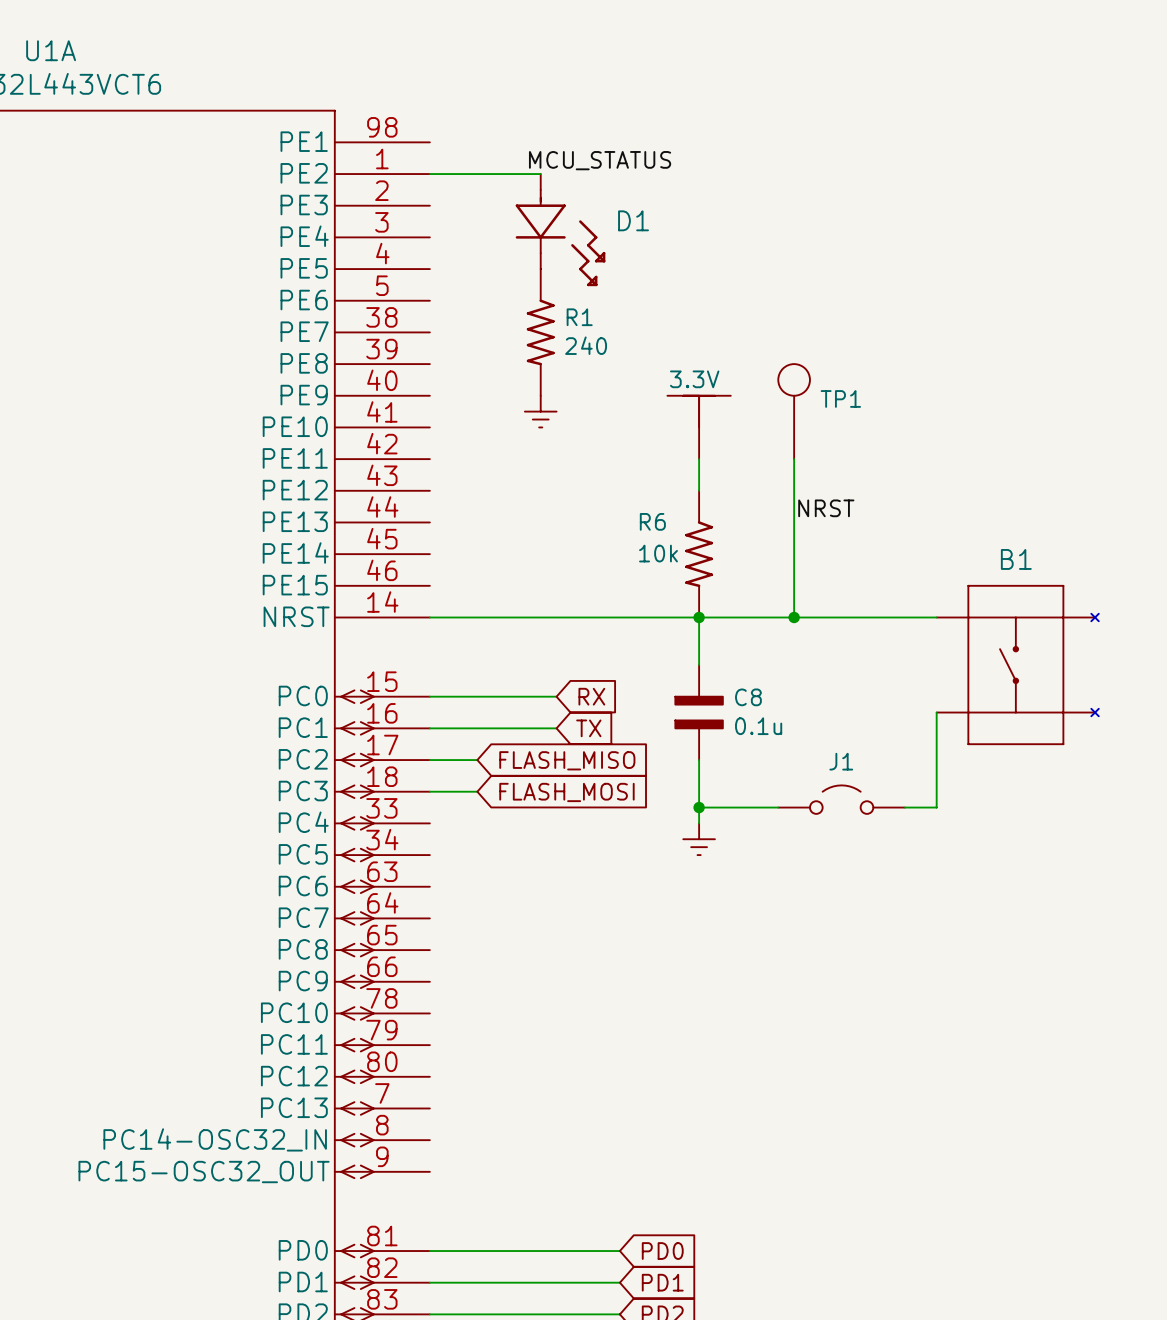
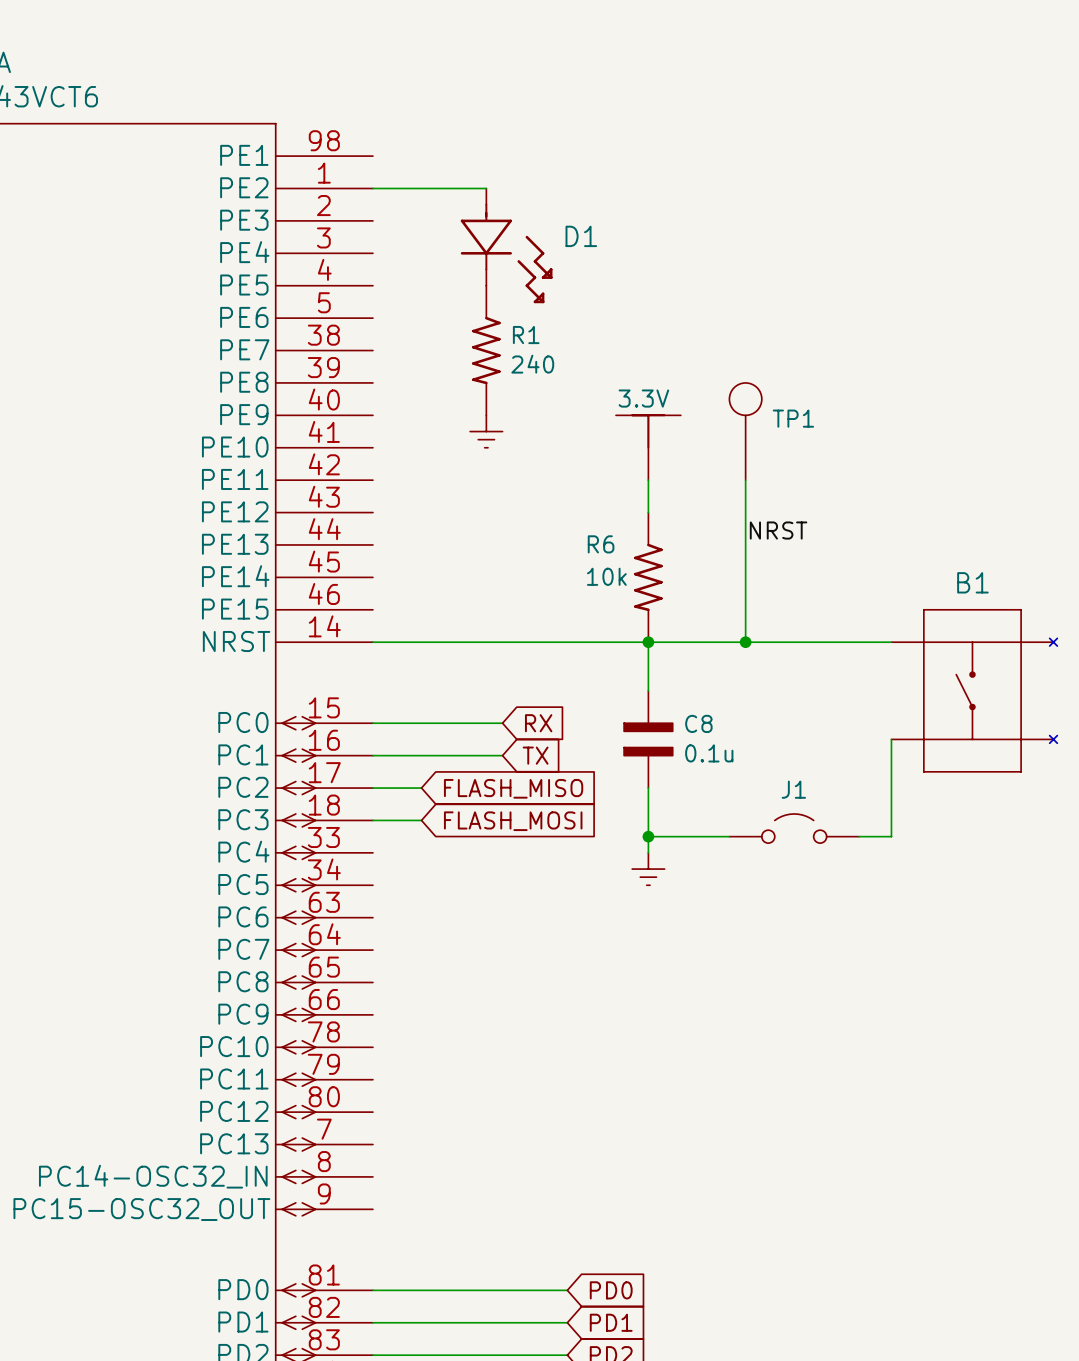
label: MCU_STATUS (600, 160) -> none

